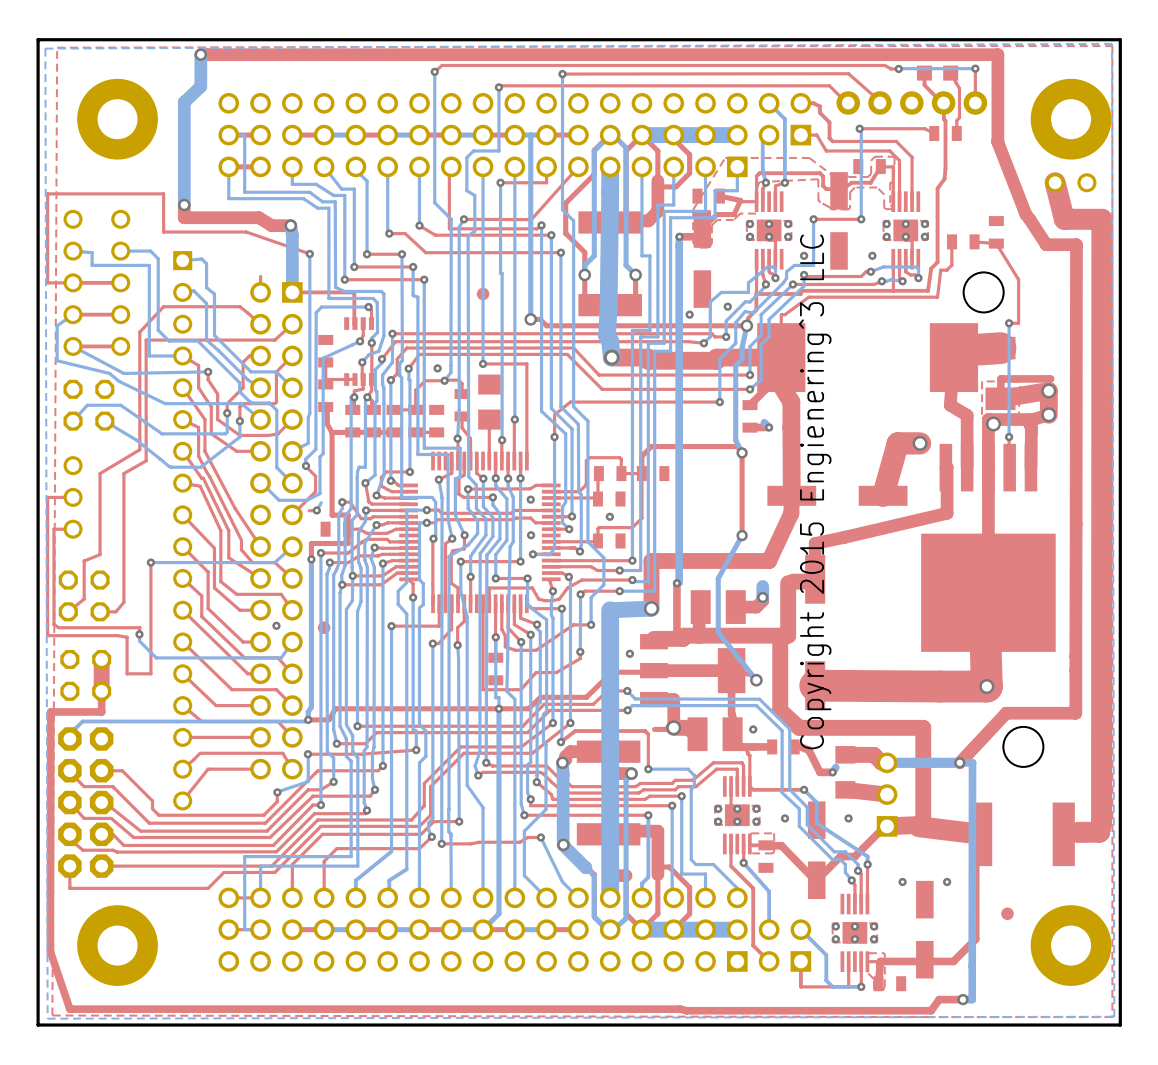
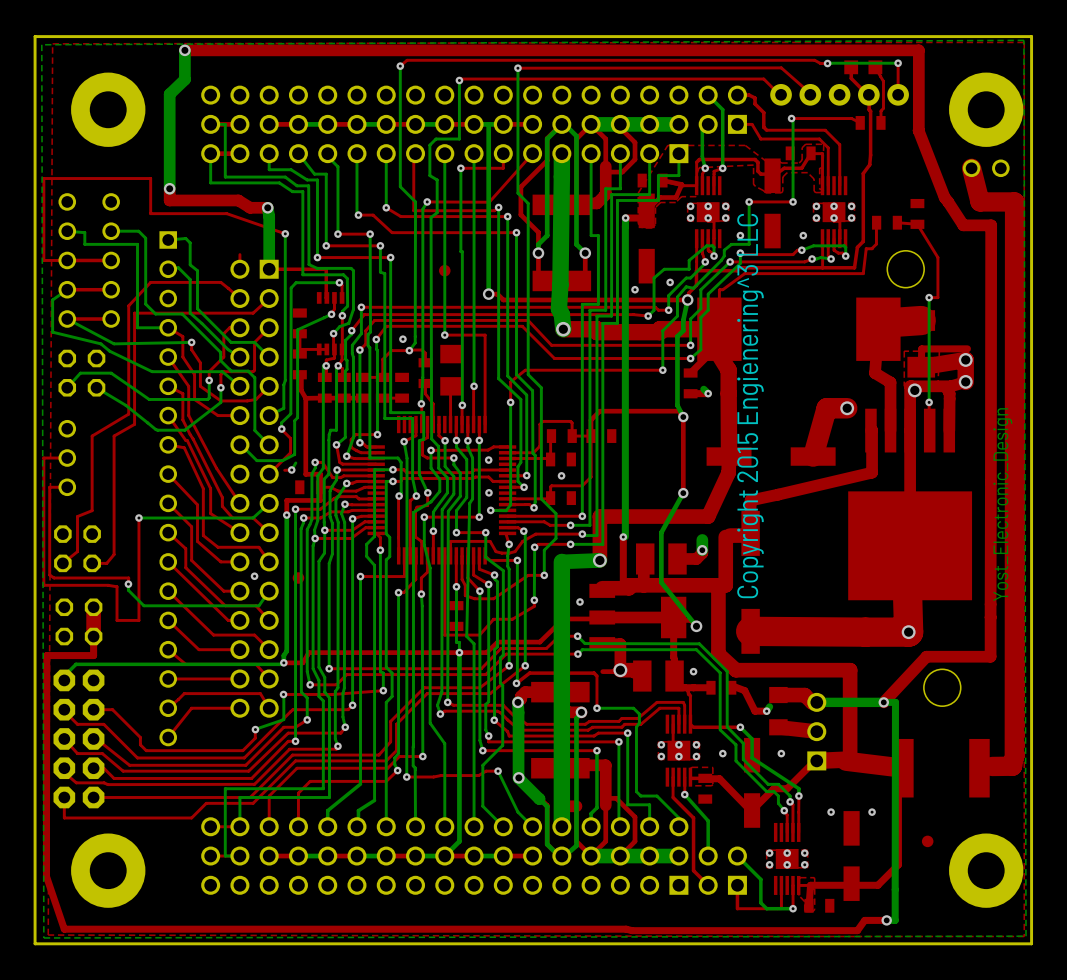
text: none -> Yost_Electronic_Design (1002, 504)

